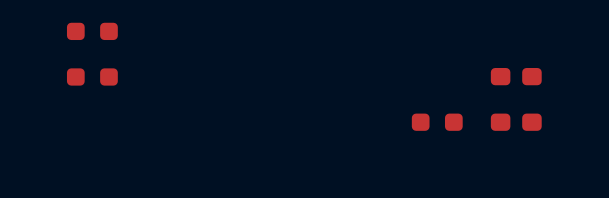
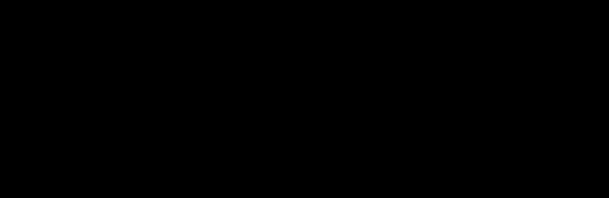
part: (92, 31) -> none
part: (92, 76) -> none
part: (516, 76) -> none
part: (437, 122) -> none
part: (516, 122) -> none

